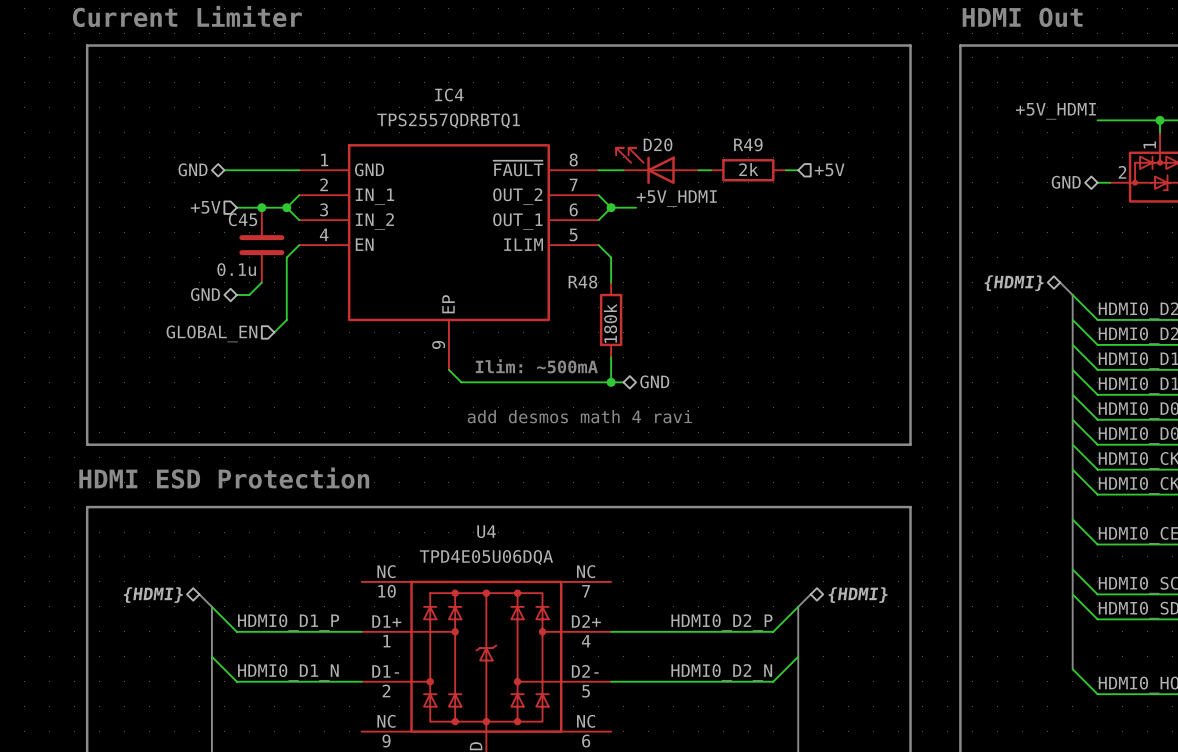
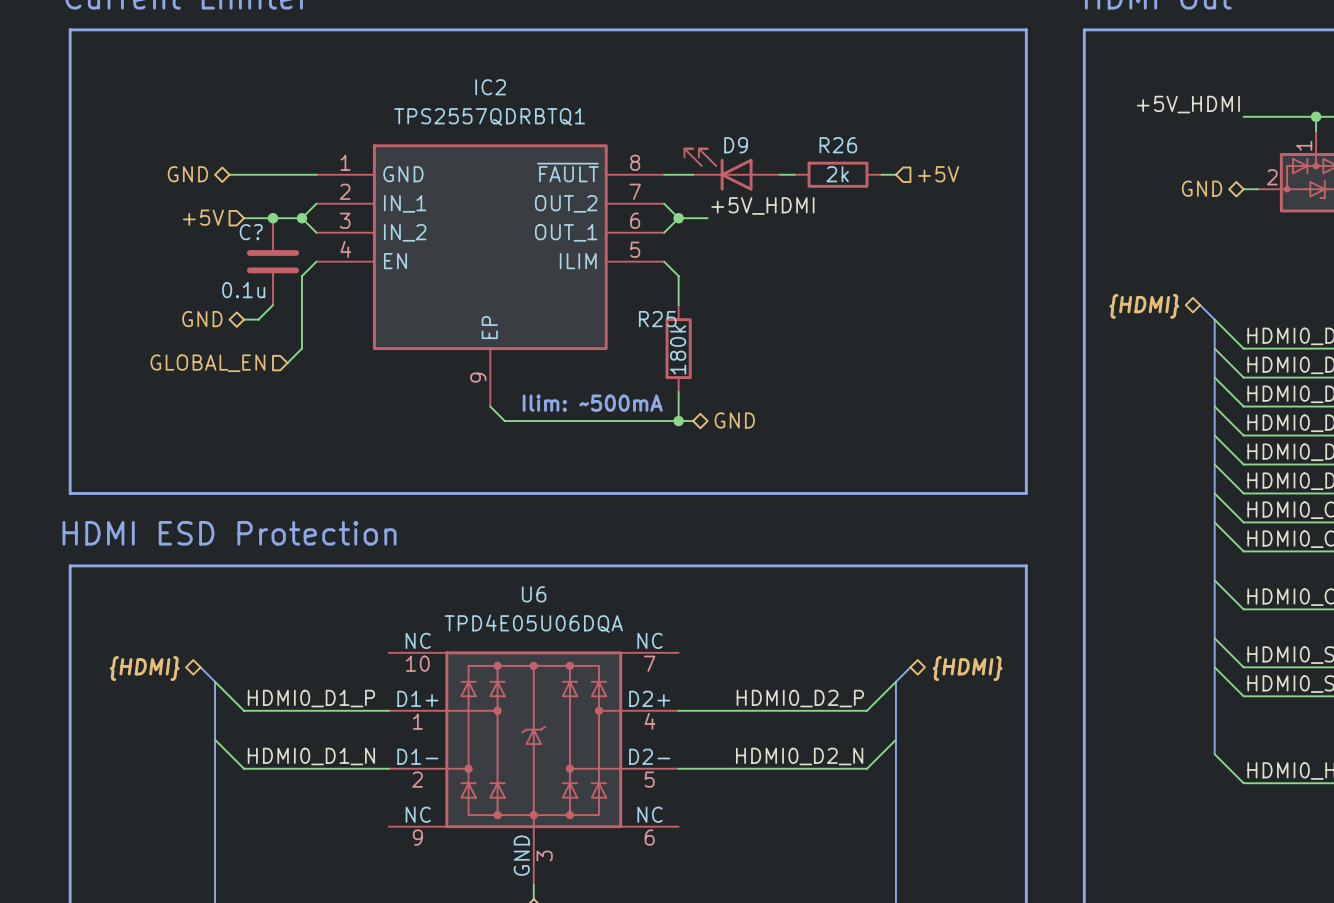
IC4 name: IC4 (449, 94) -> IC2 (490, 87)
D20 name: D20 (658, 144) -> D9 (736, 145)
R49 name: R49 (748, 144) -> R26 (838, 145)
C45 name: C45 (243, 219) -> C? (251, 232)
R48 name: R48 (582, 282) -> R25 (657, 319)
text: add desmos math 4 ravi (579, 416) -> none
U4 name: U4 (486, 531) -> U6 (534, 594)

